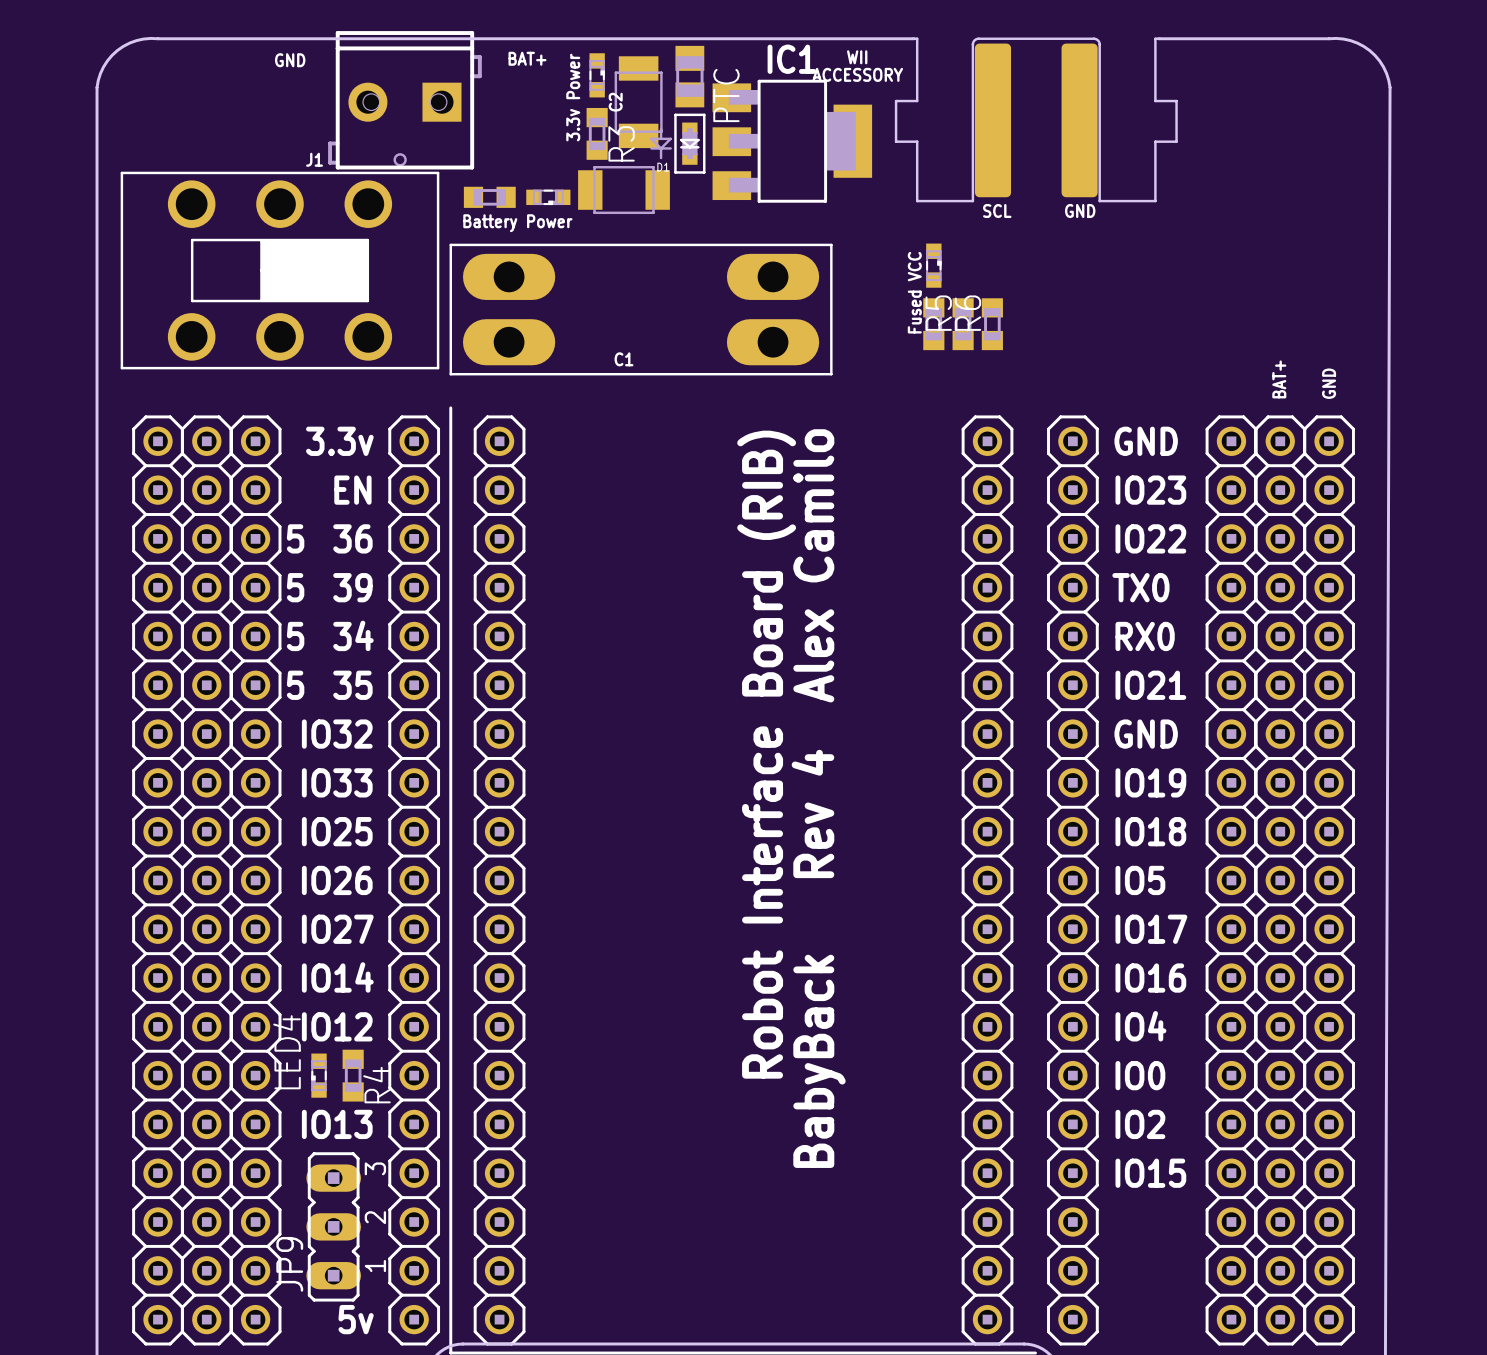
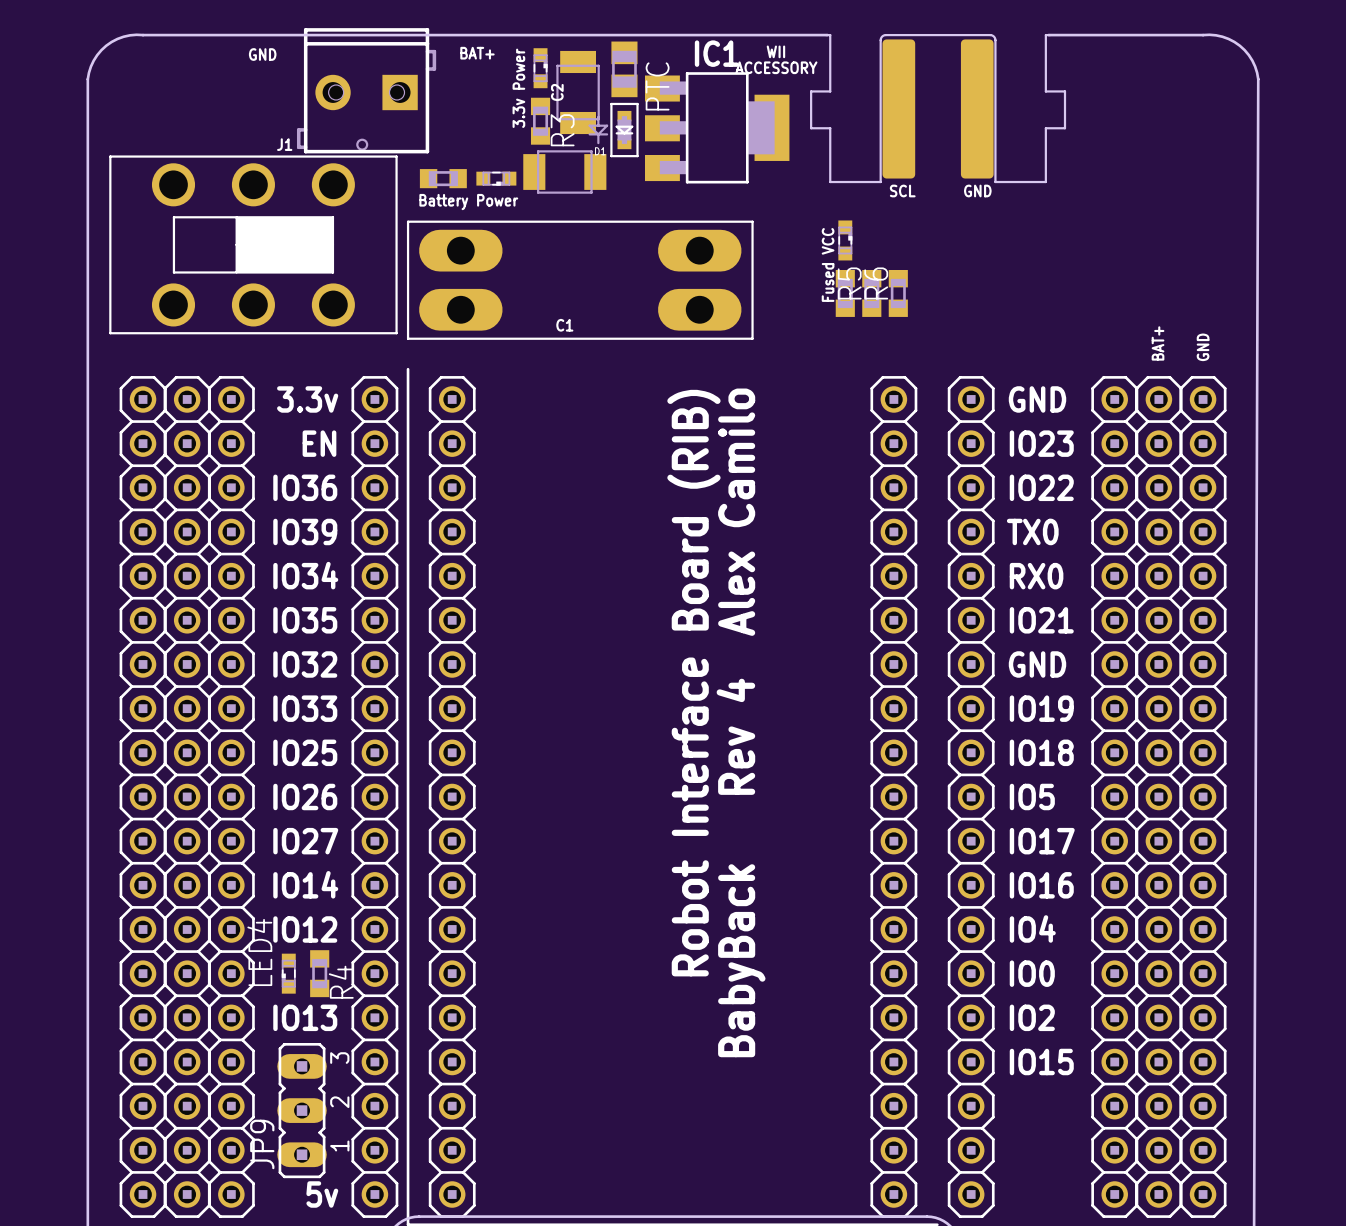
text: 5 (295, 538) -> none
text: 36 (352, 538) -> IO36 (305, 487)
text: 5 (295, 587) -> none
text: 39 (352, 587) -> IO39 (305, 531)
text: 34 (353, 635) -> IO34 (305, 575)
text: 5 (295, 636) -> none
text: 5 (295, 685) -> none
text: 35 (352, 685) -> IO35 (305, 620)

